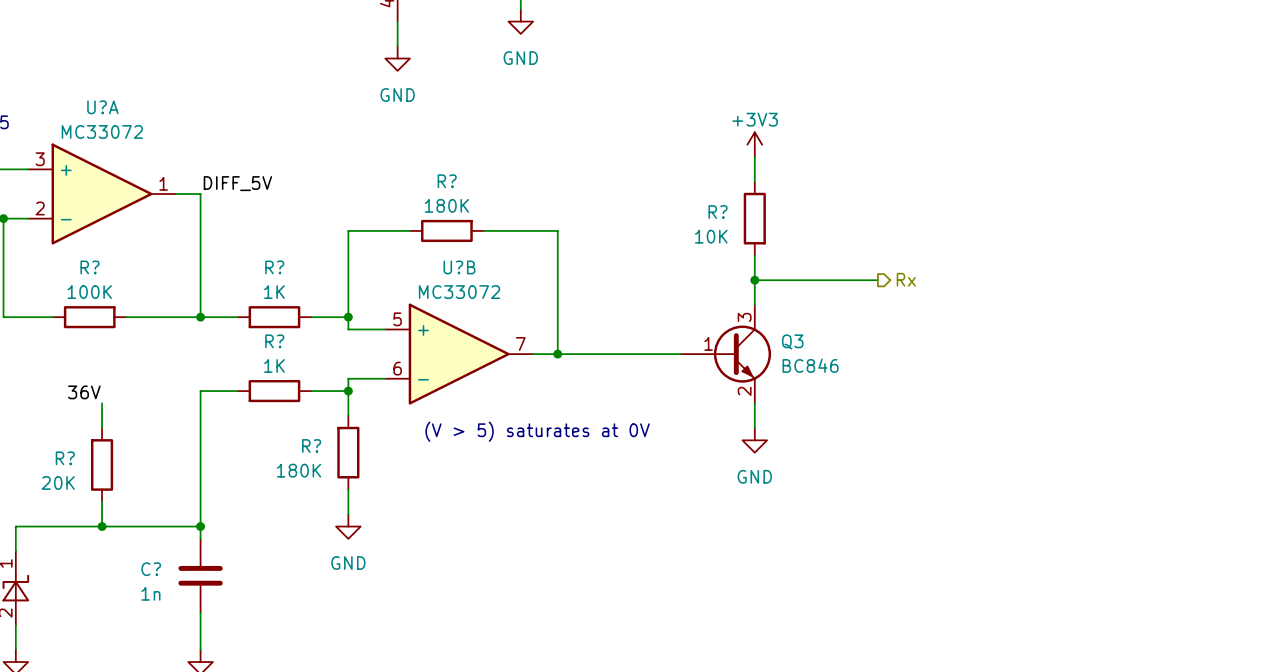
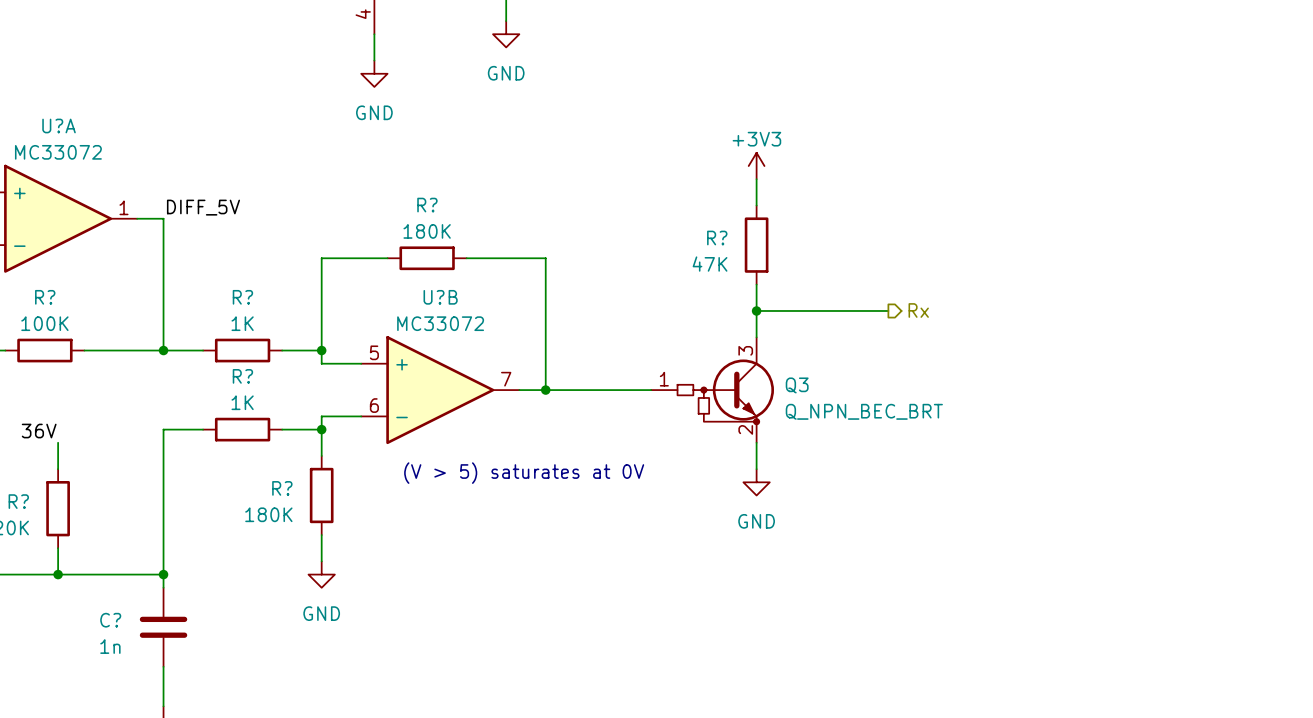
R? value: 10K (711, 236) -> 47K (710, 264)
Q3 symbol: [680, 304, 772, 404] -> [651, 337, 774, 443]
Q3 value: BC846 (810, 365) -> Q_NPN_BEC_BRT (864, 411)

